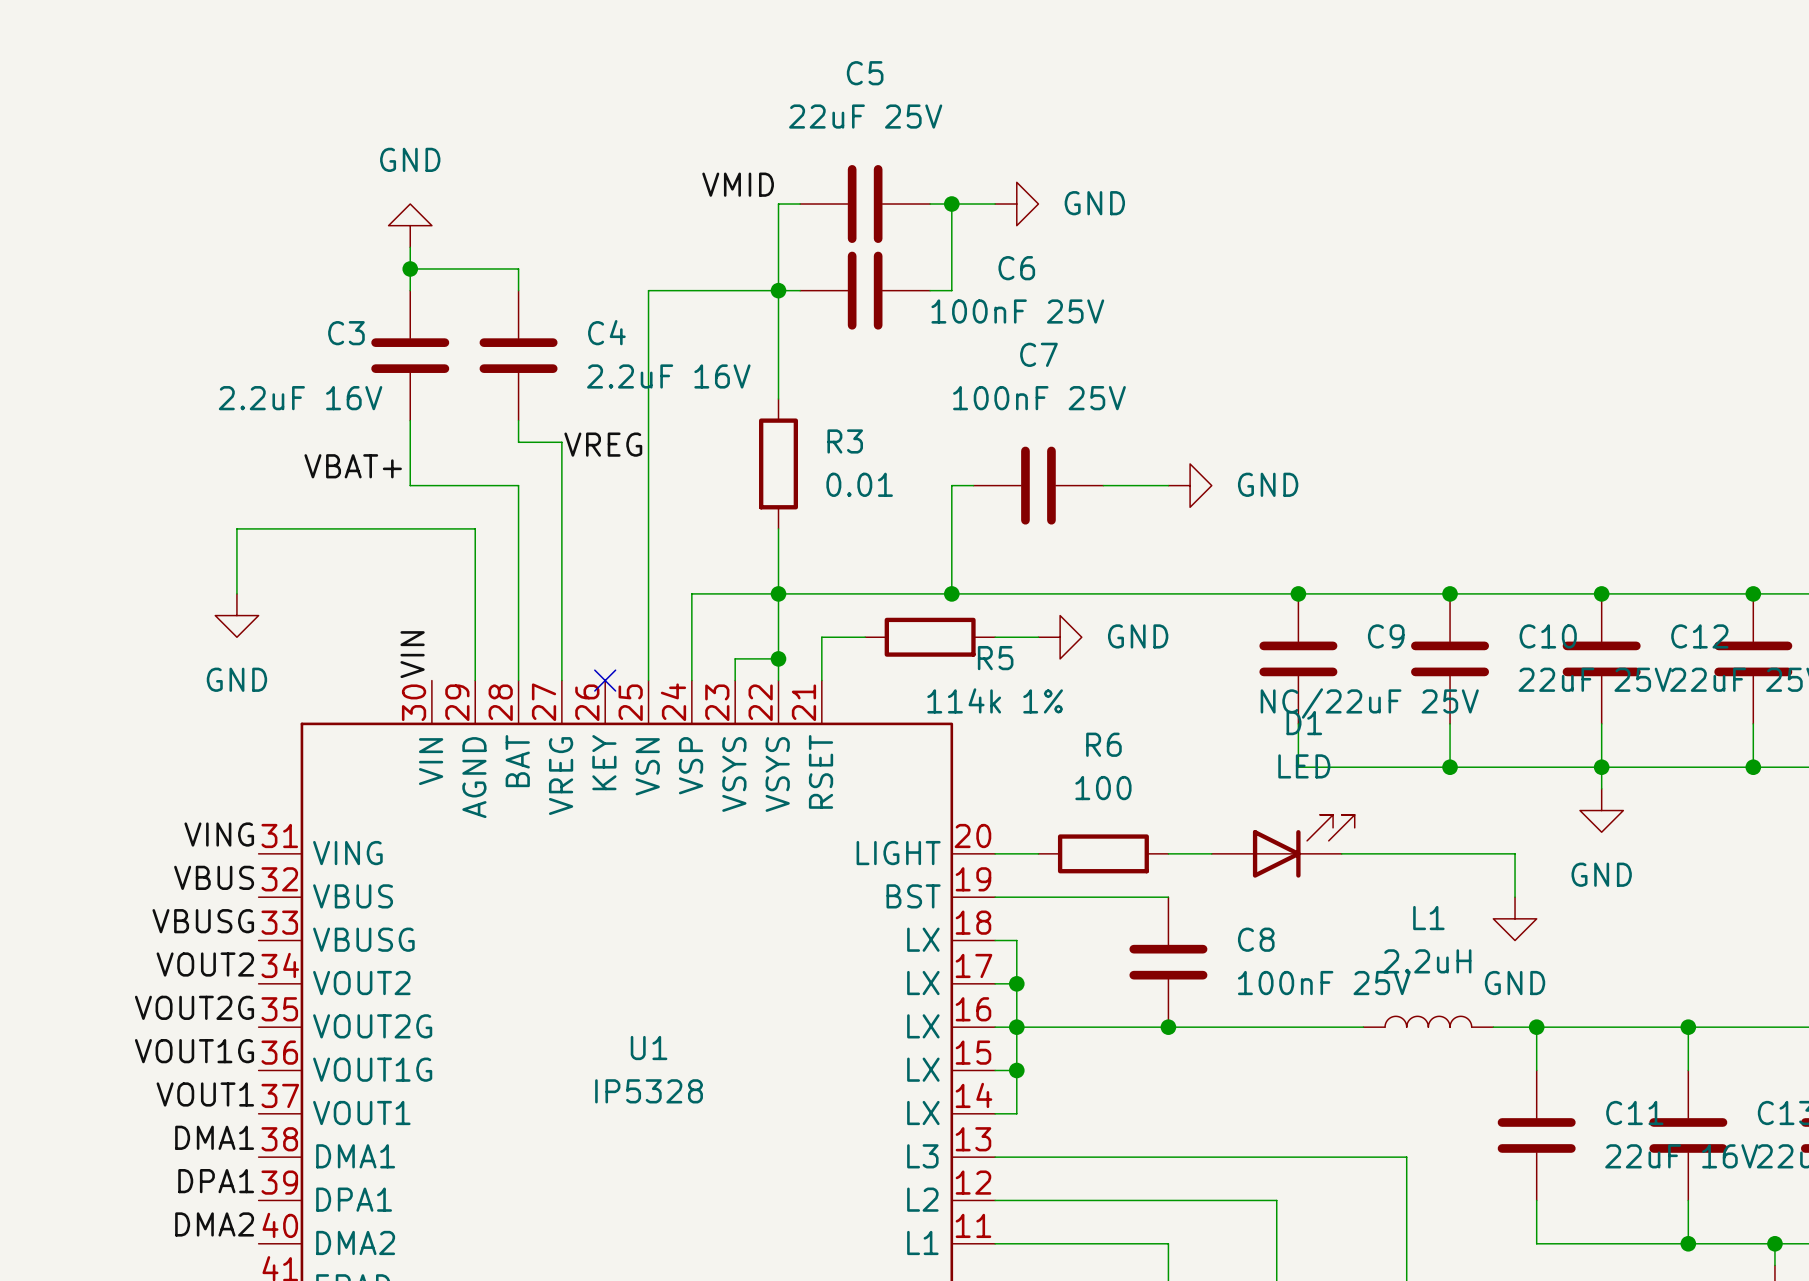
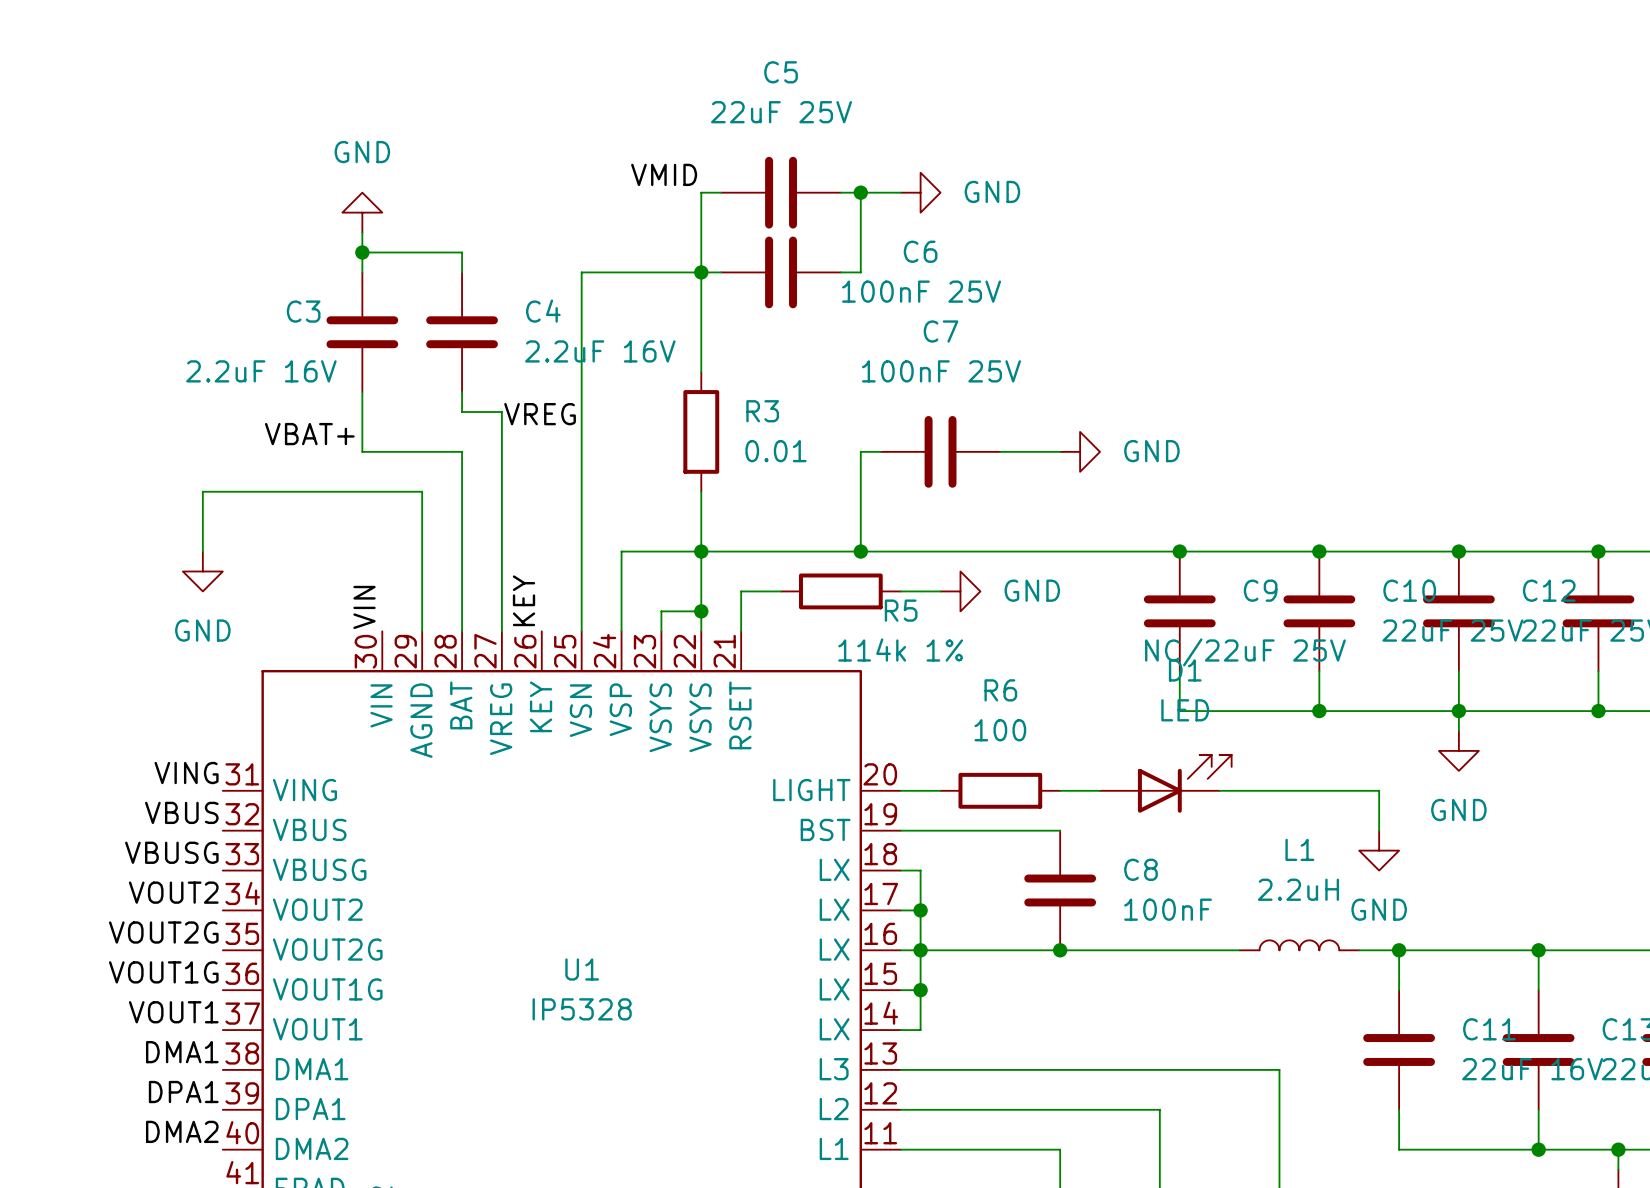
label: none -> KEY (524, 600)
no-connect mark: (605, 680) -> none
C8 value: 100nF 25V (1324, 983) -> 100nF (1168, 909)

